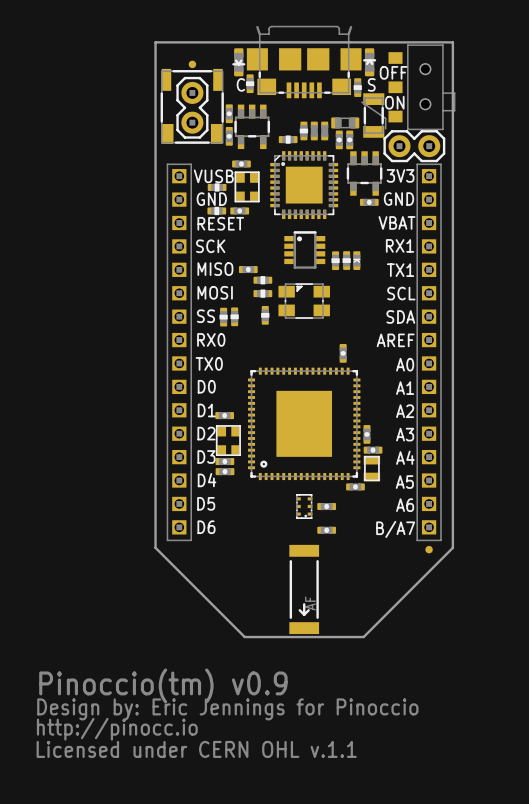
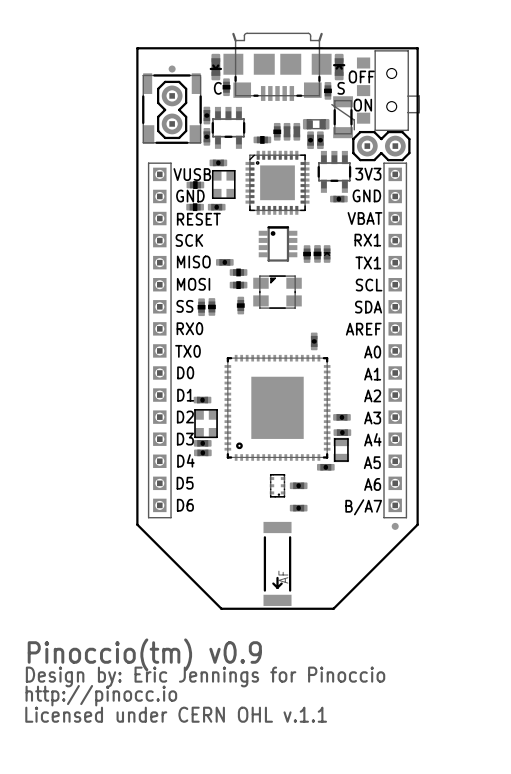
part rotation: 0° (366, 434) -> 90° clockwise (341, 417)

